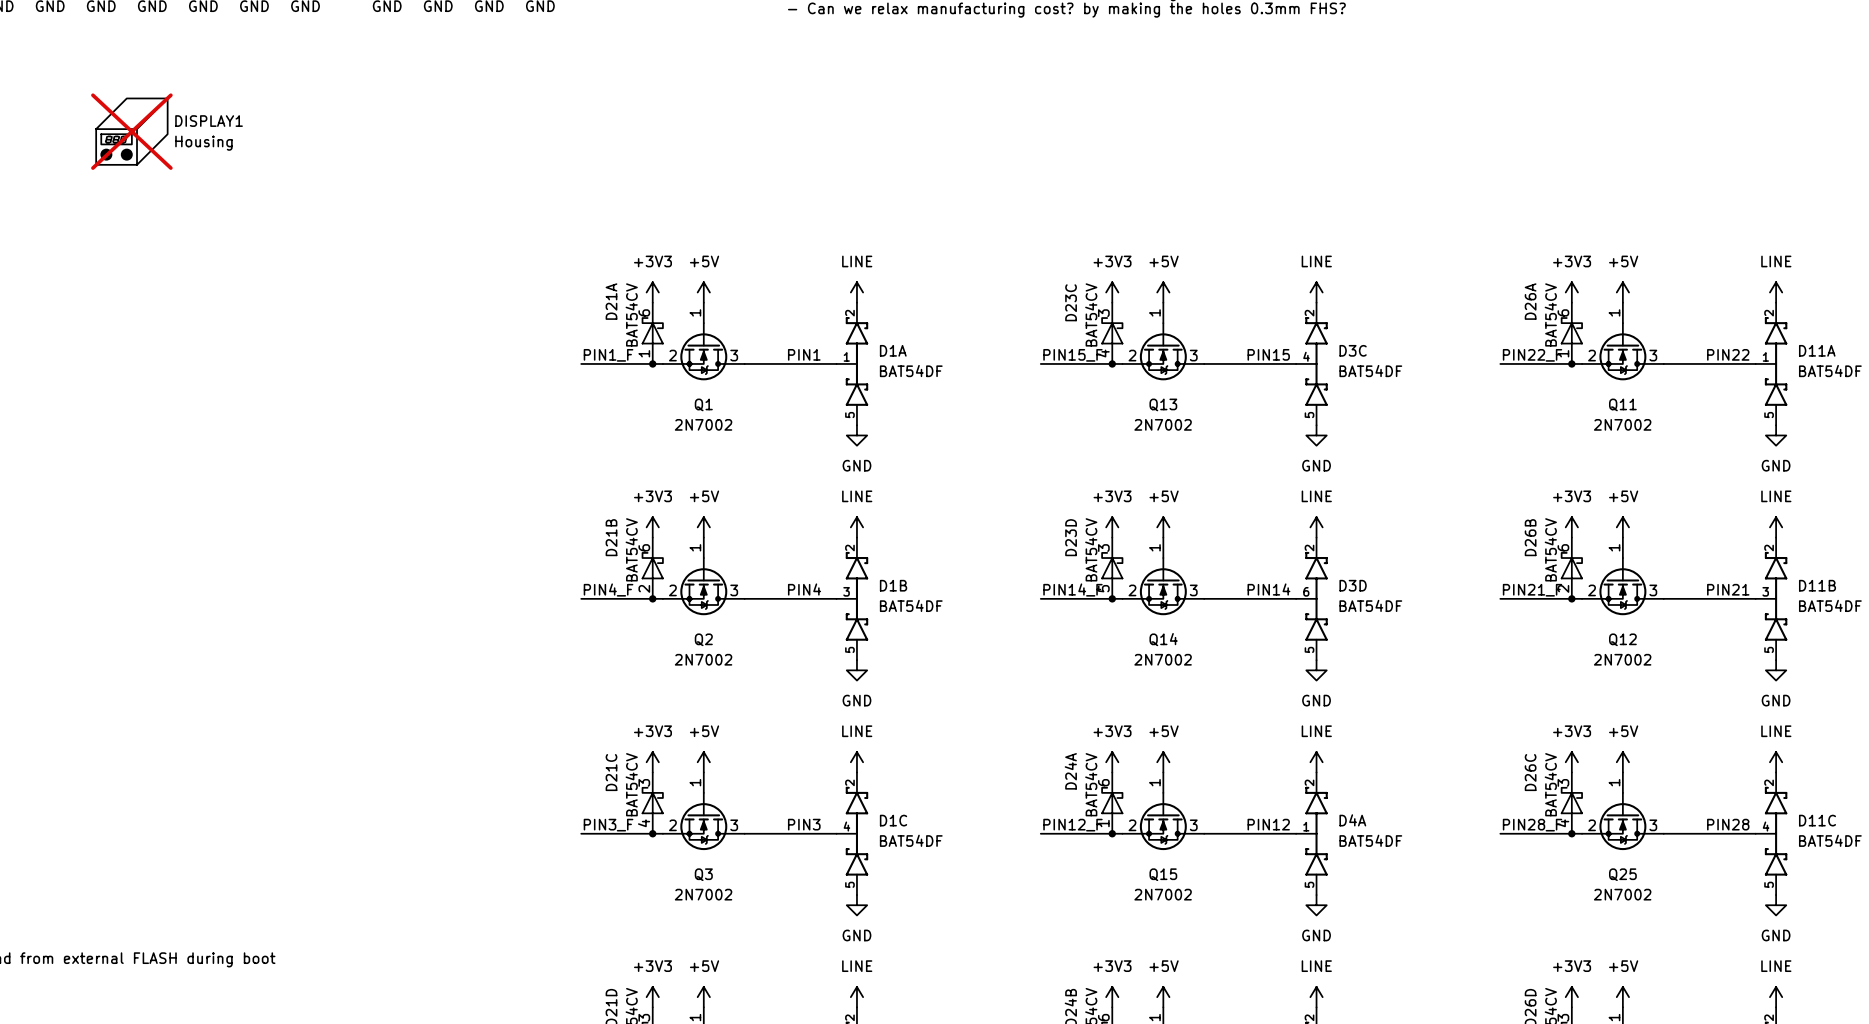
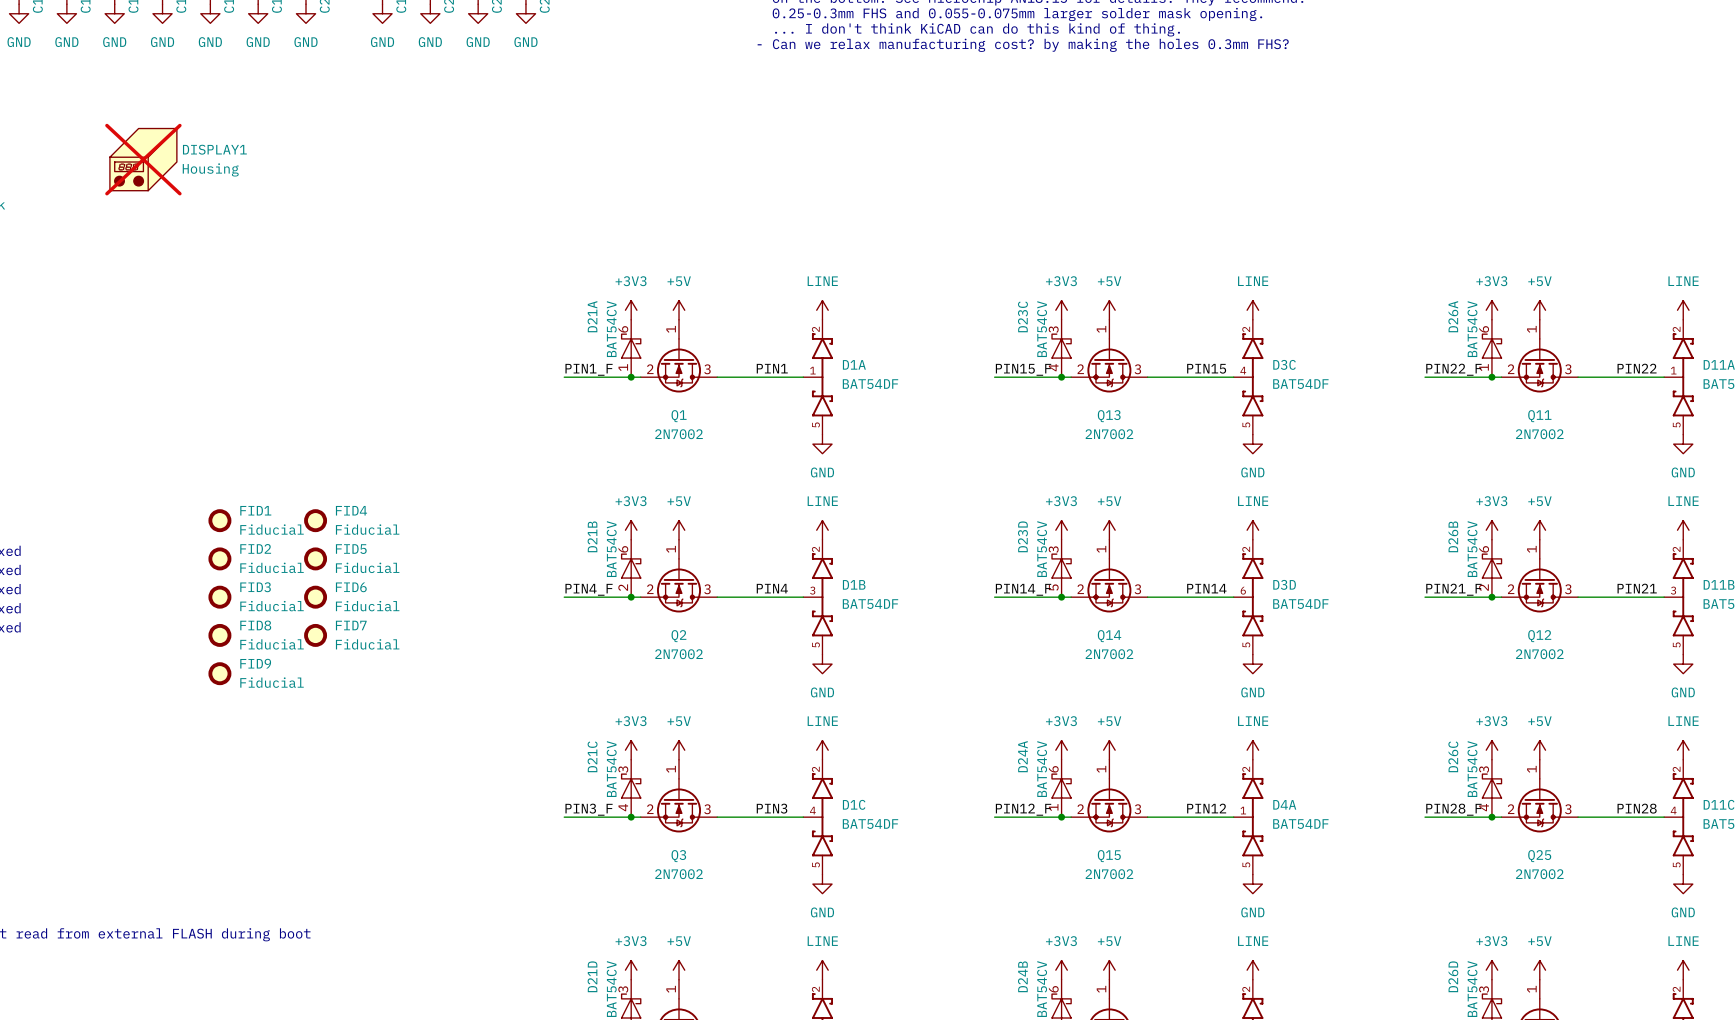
FID1: none -> Fiducial (219, 520)
FID4: none -> Fiducial (315, 520)
FID2: none -> Fiducial (219, 558)
FID5: none -> Fiducial (315, 558)
FID3: none -> Fiducial (219, 597)
FID6: none -> Fiducial (315, 597)
FID8: none -> Fiducial (219, 635)
FID7: none -> Fiducial (315, 635)
FID9: none -> Fiducial (219, 673)

